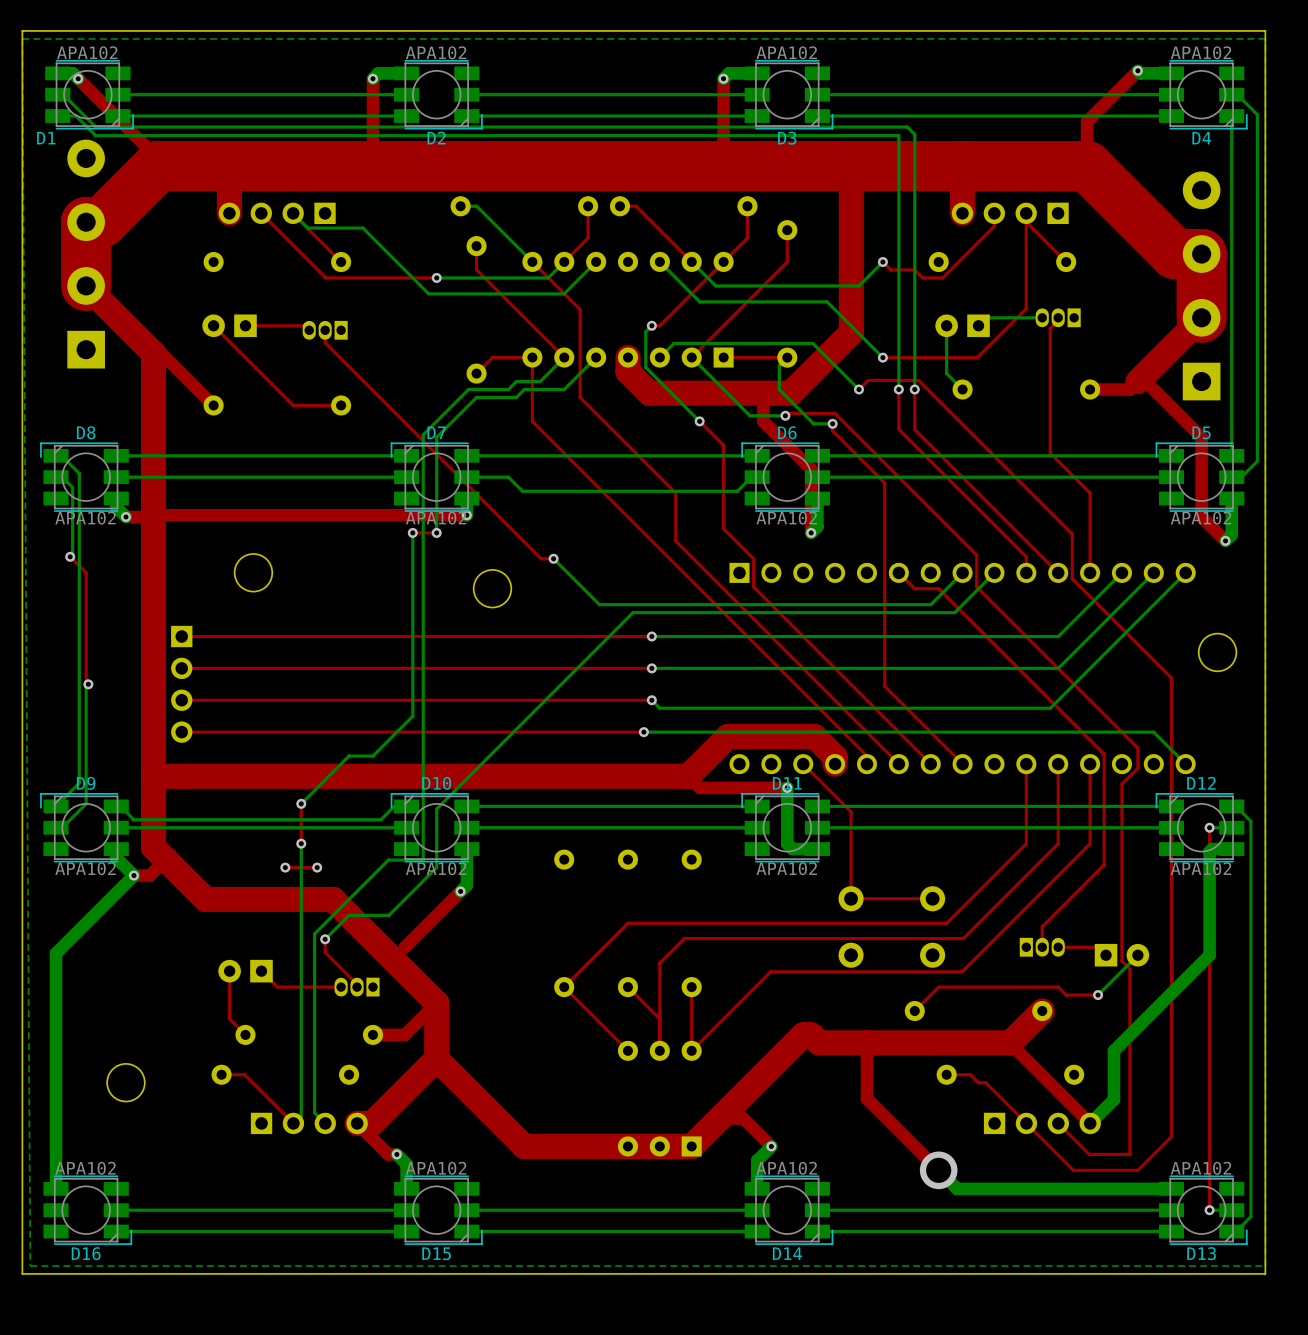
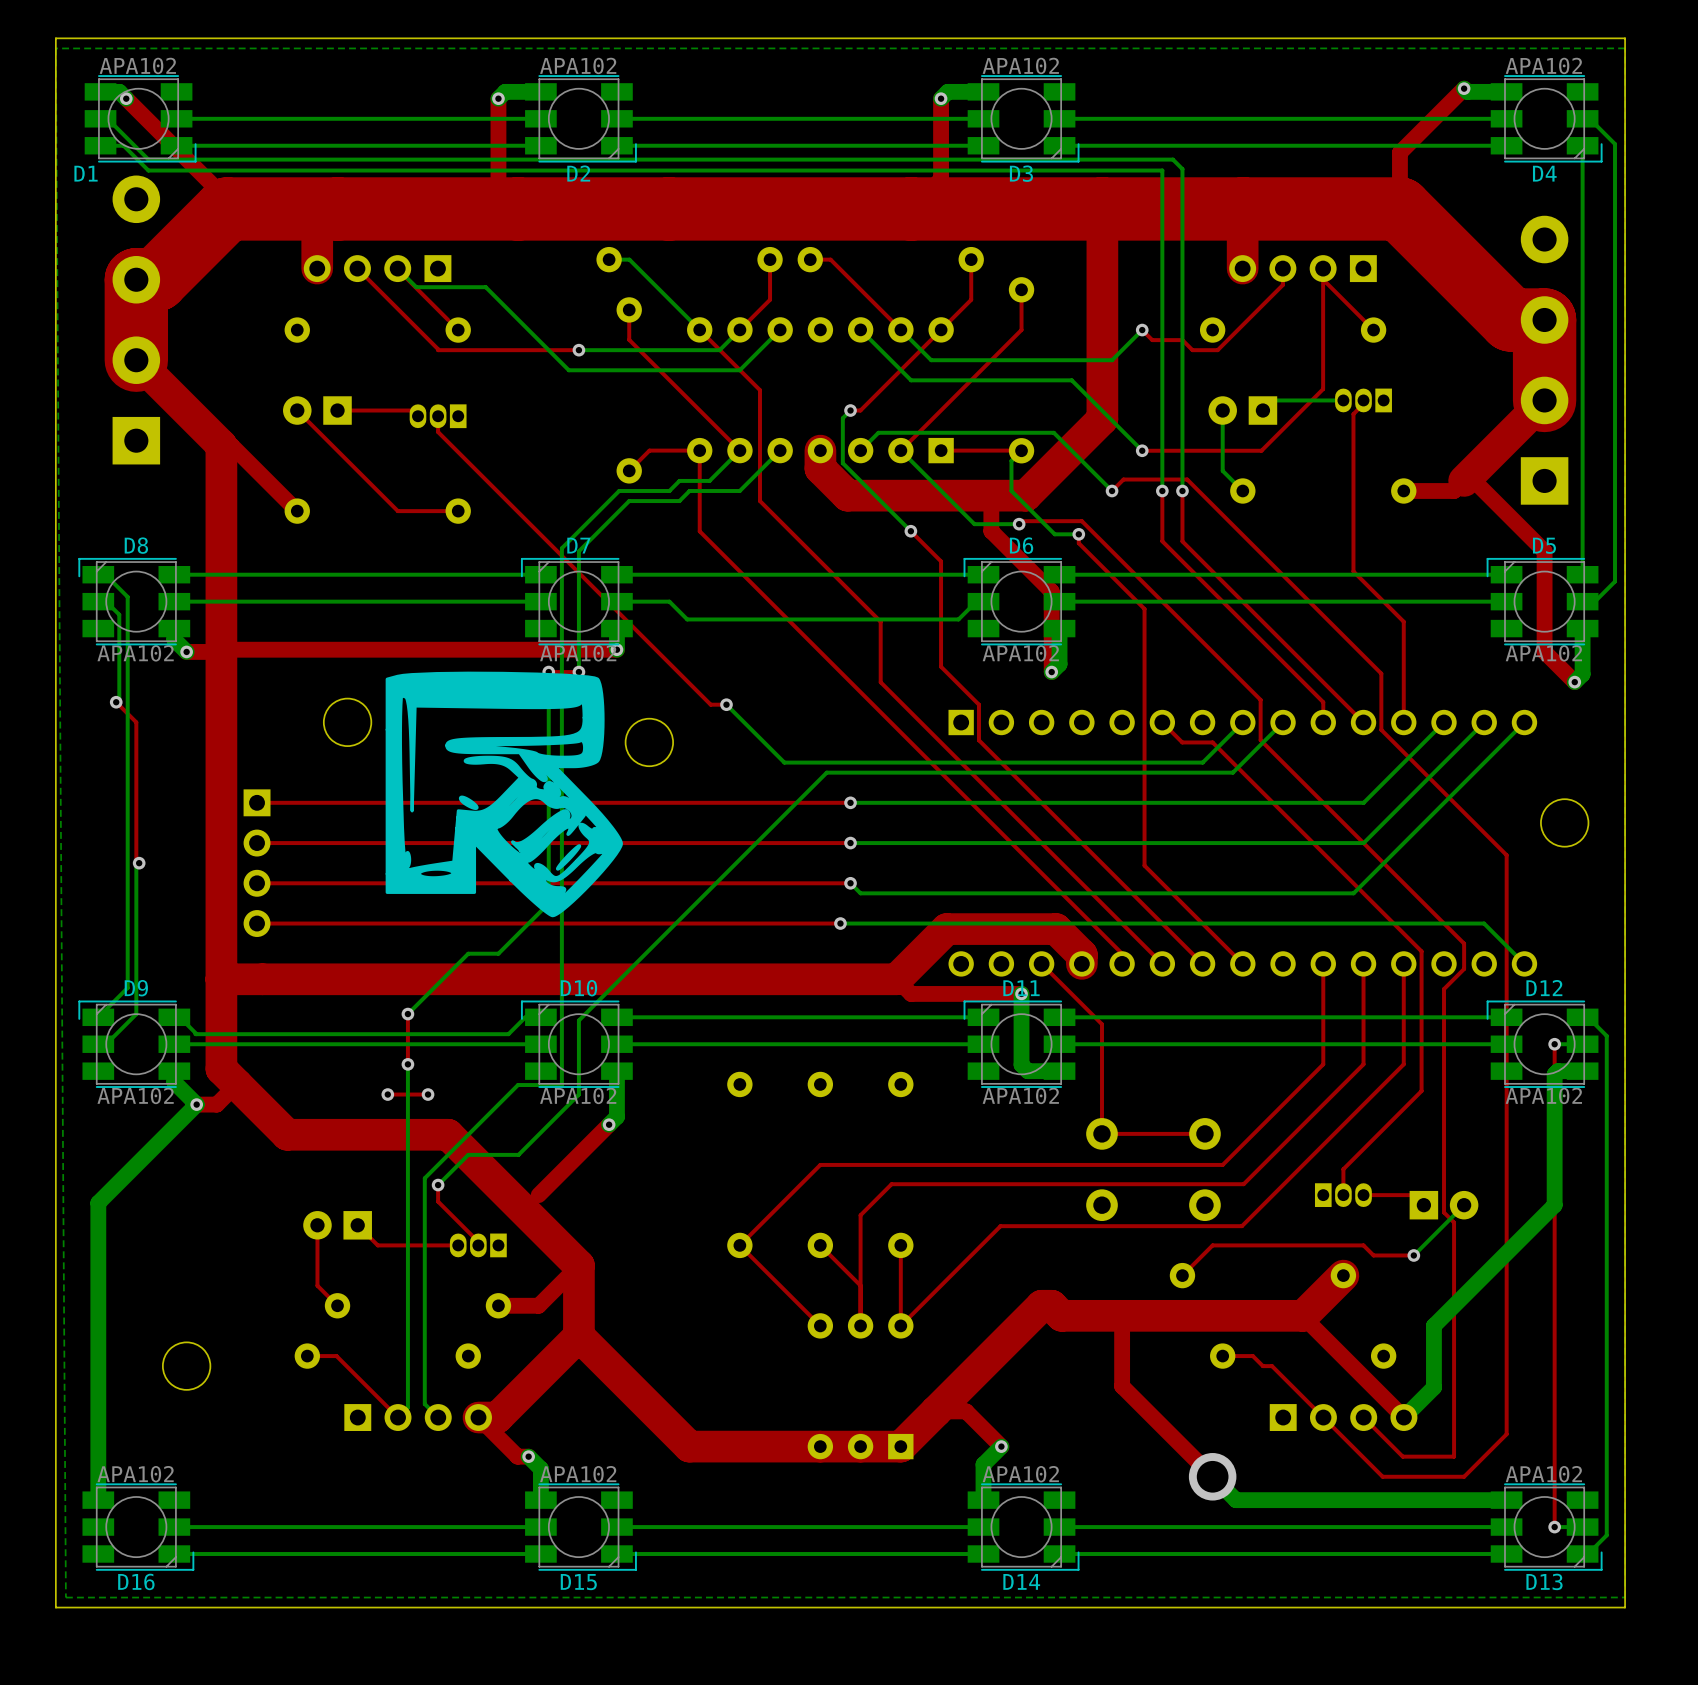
drawing: none -> [385, 671, 1033, 918]

